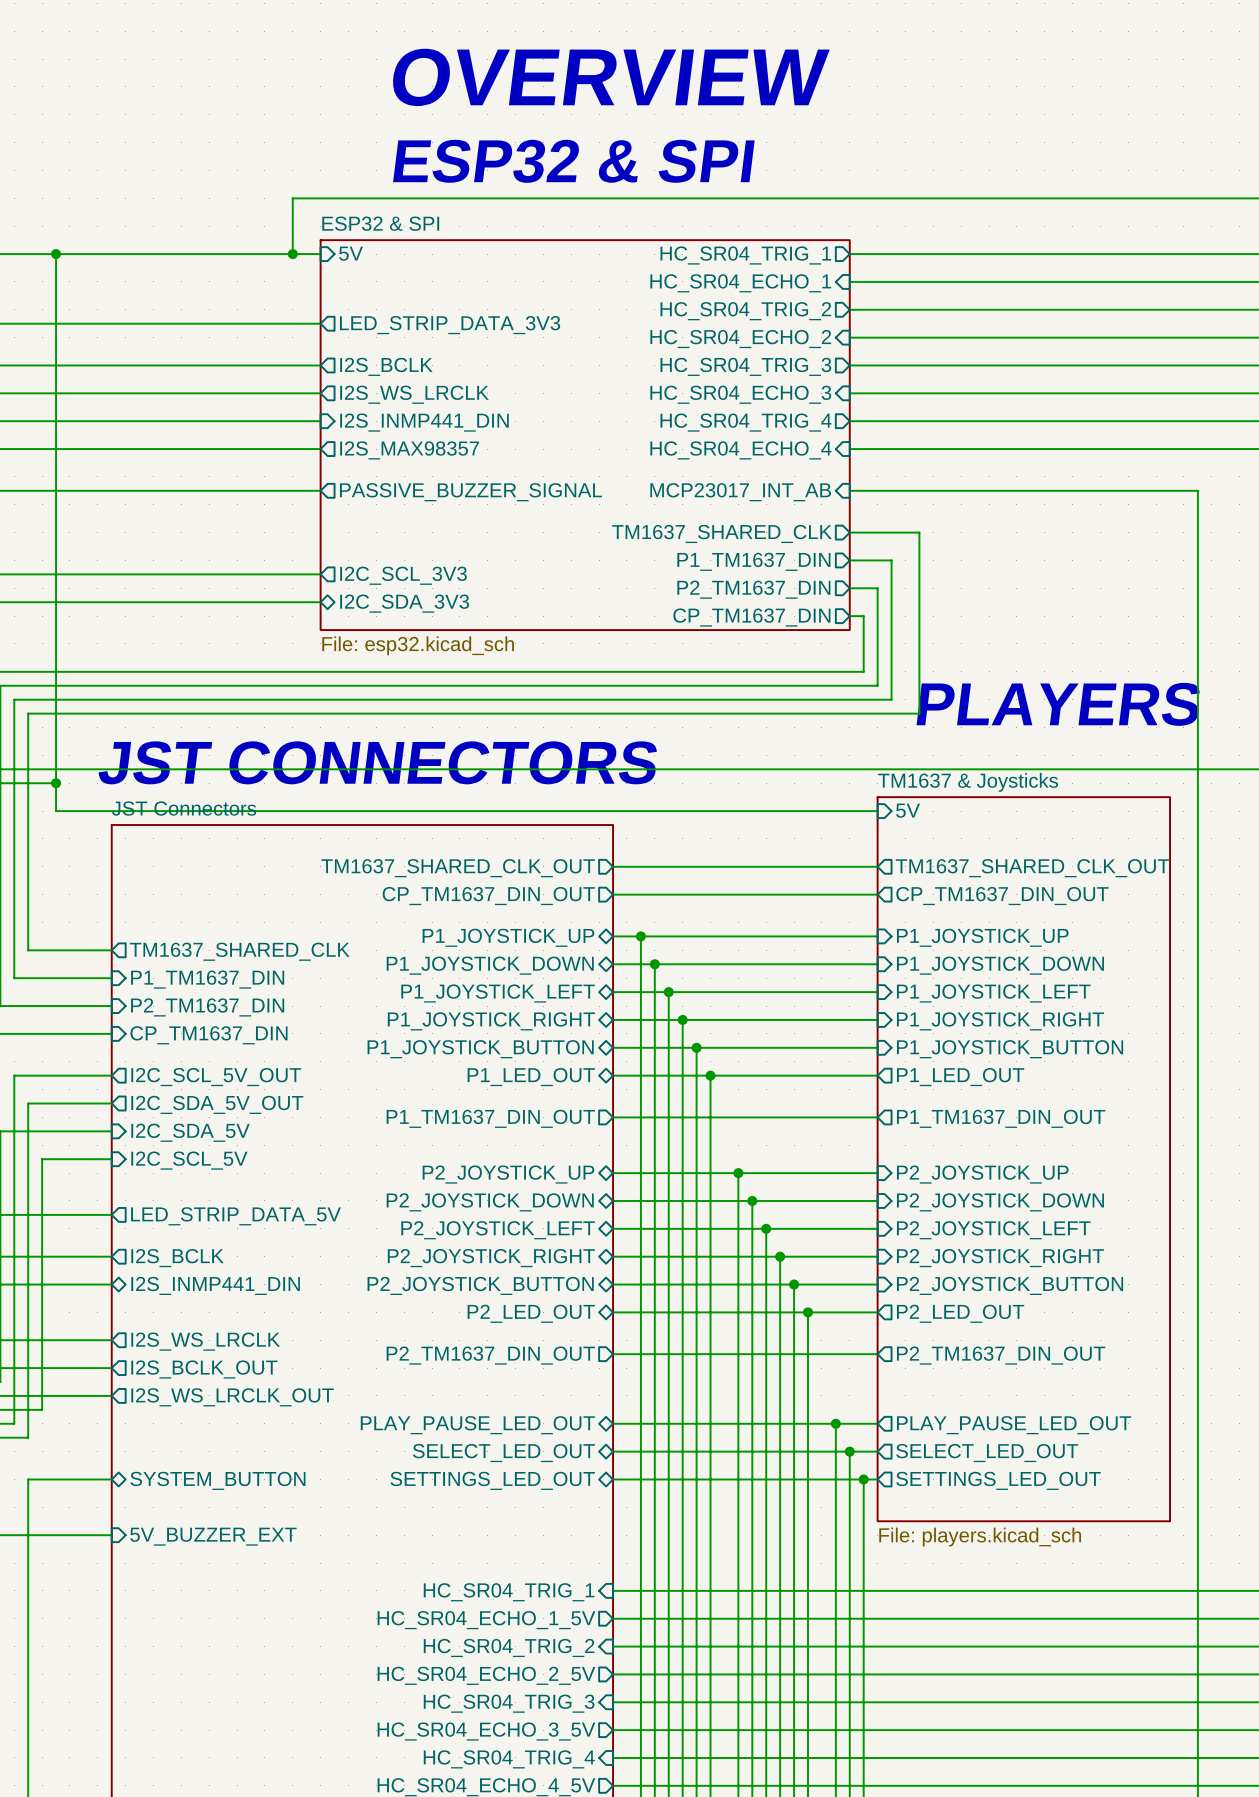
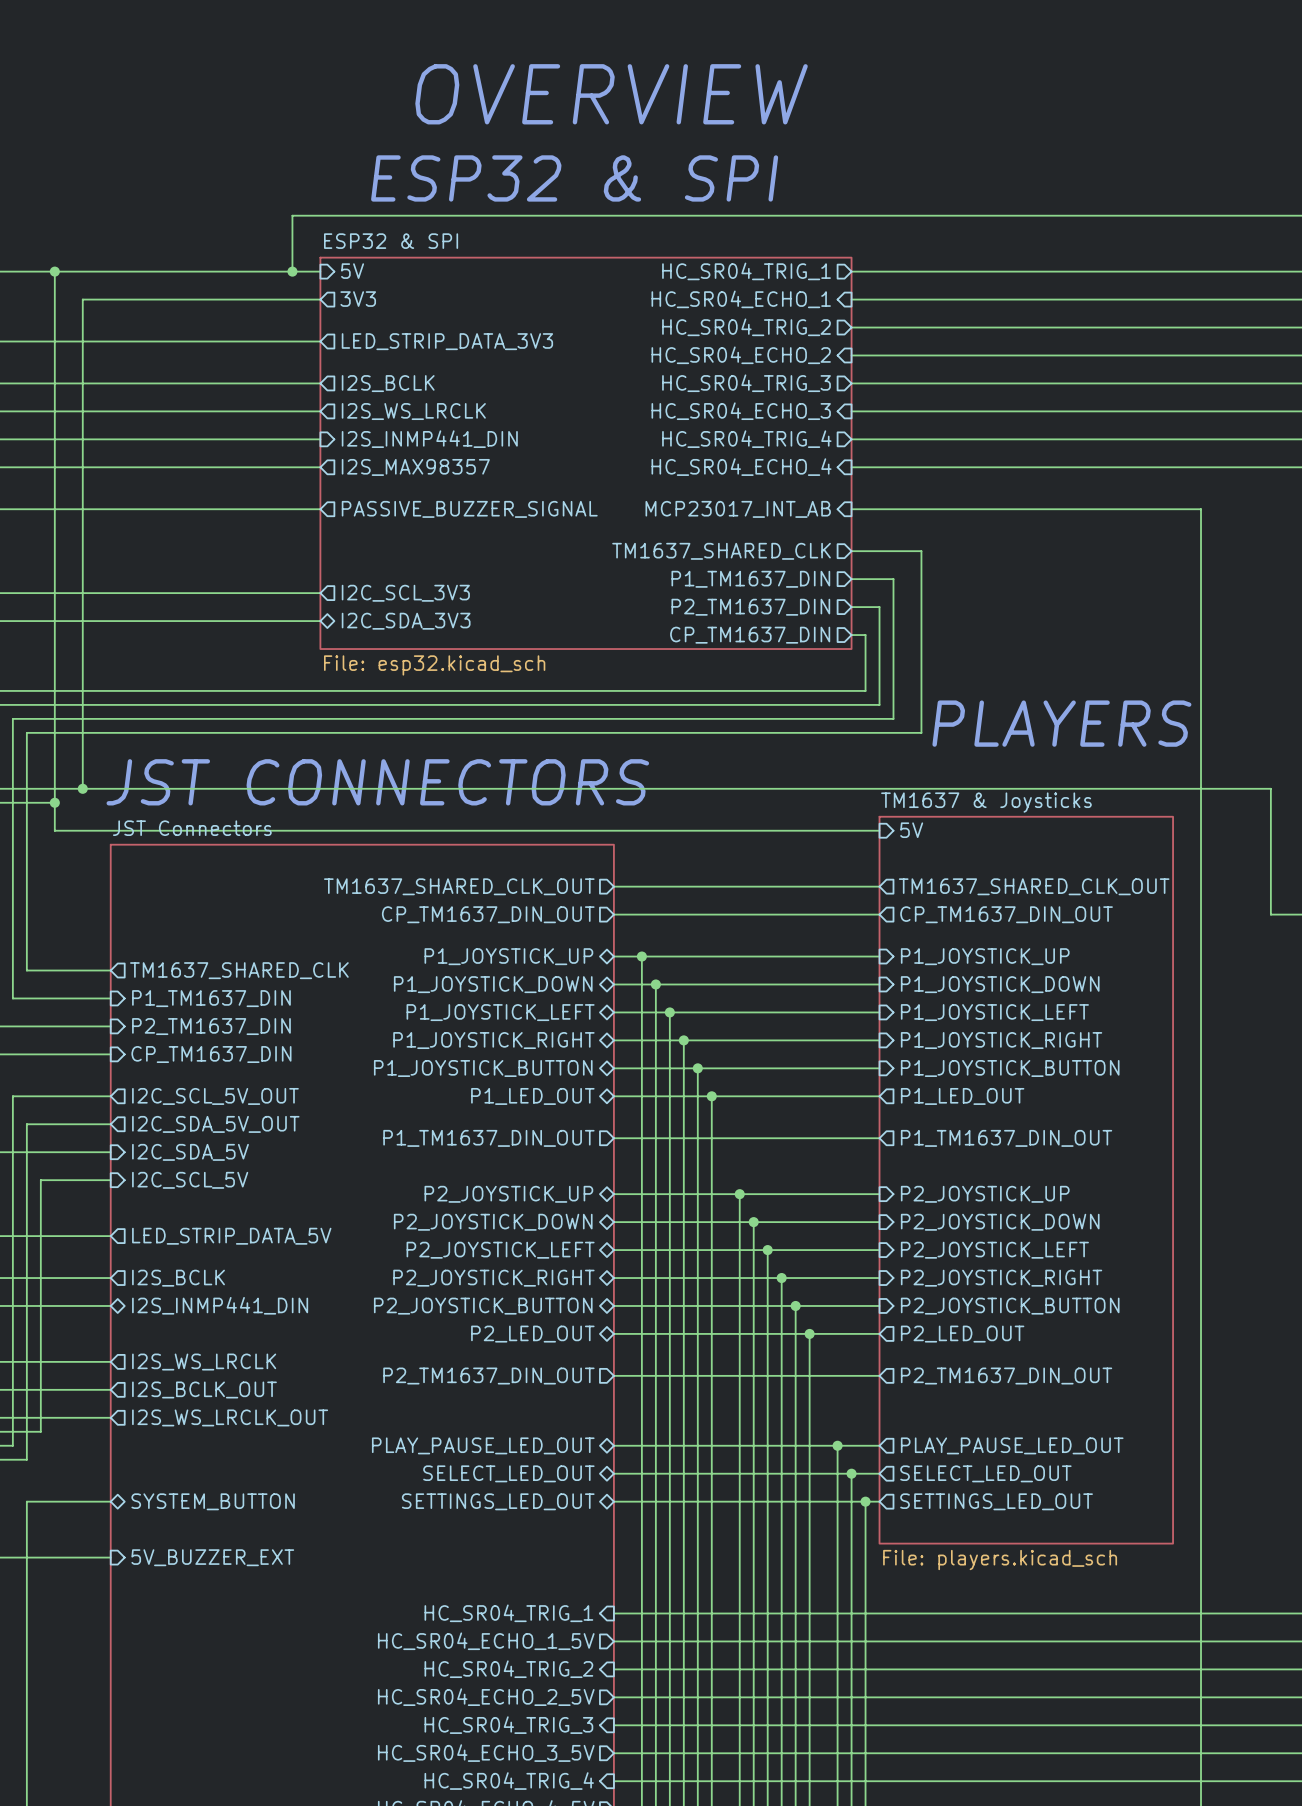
wire: none -> (320, 299) (82, 299) (82, 788)
sheet pin: none -> 3V3 (358, 299)
junction: none -> (82, 788)

